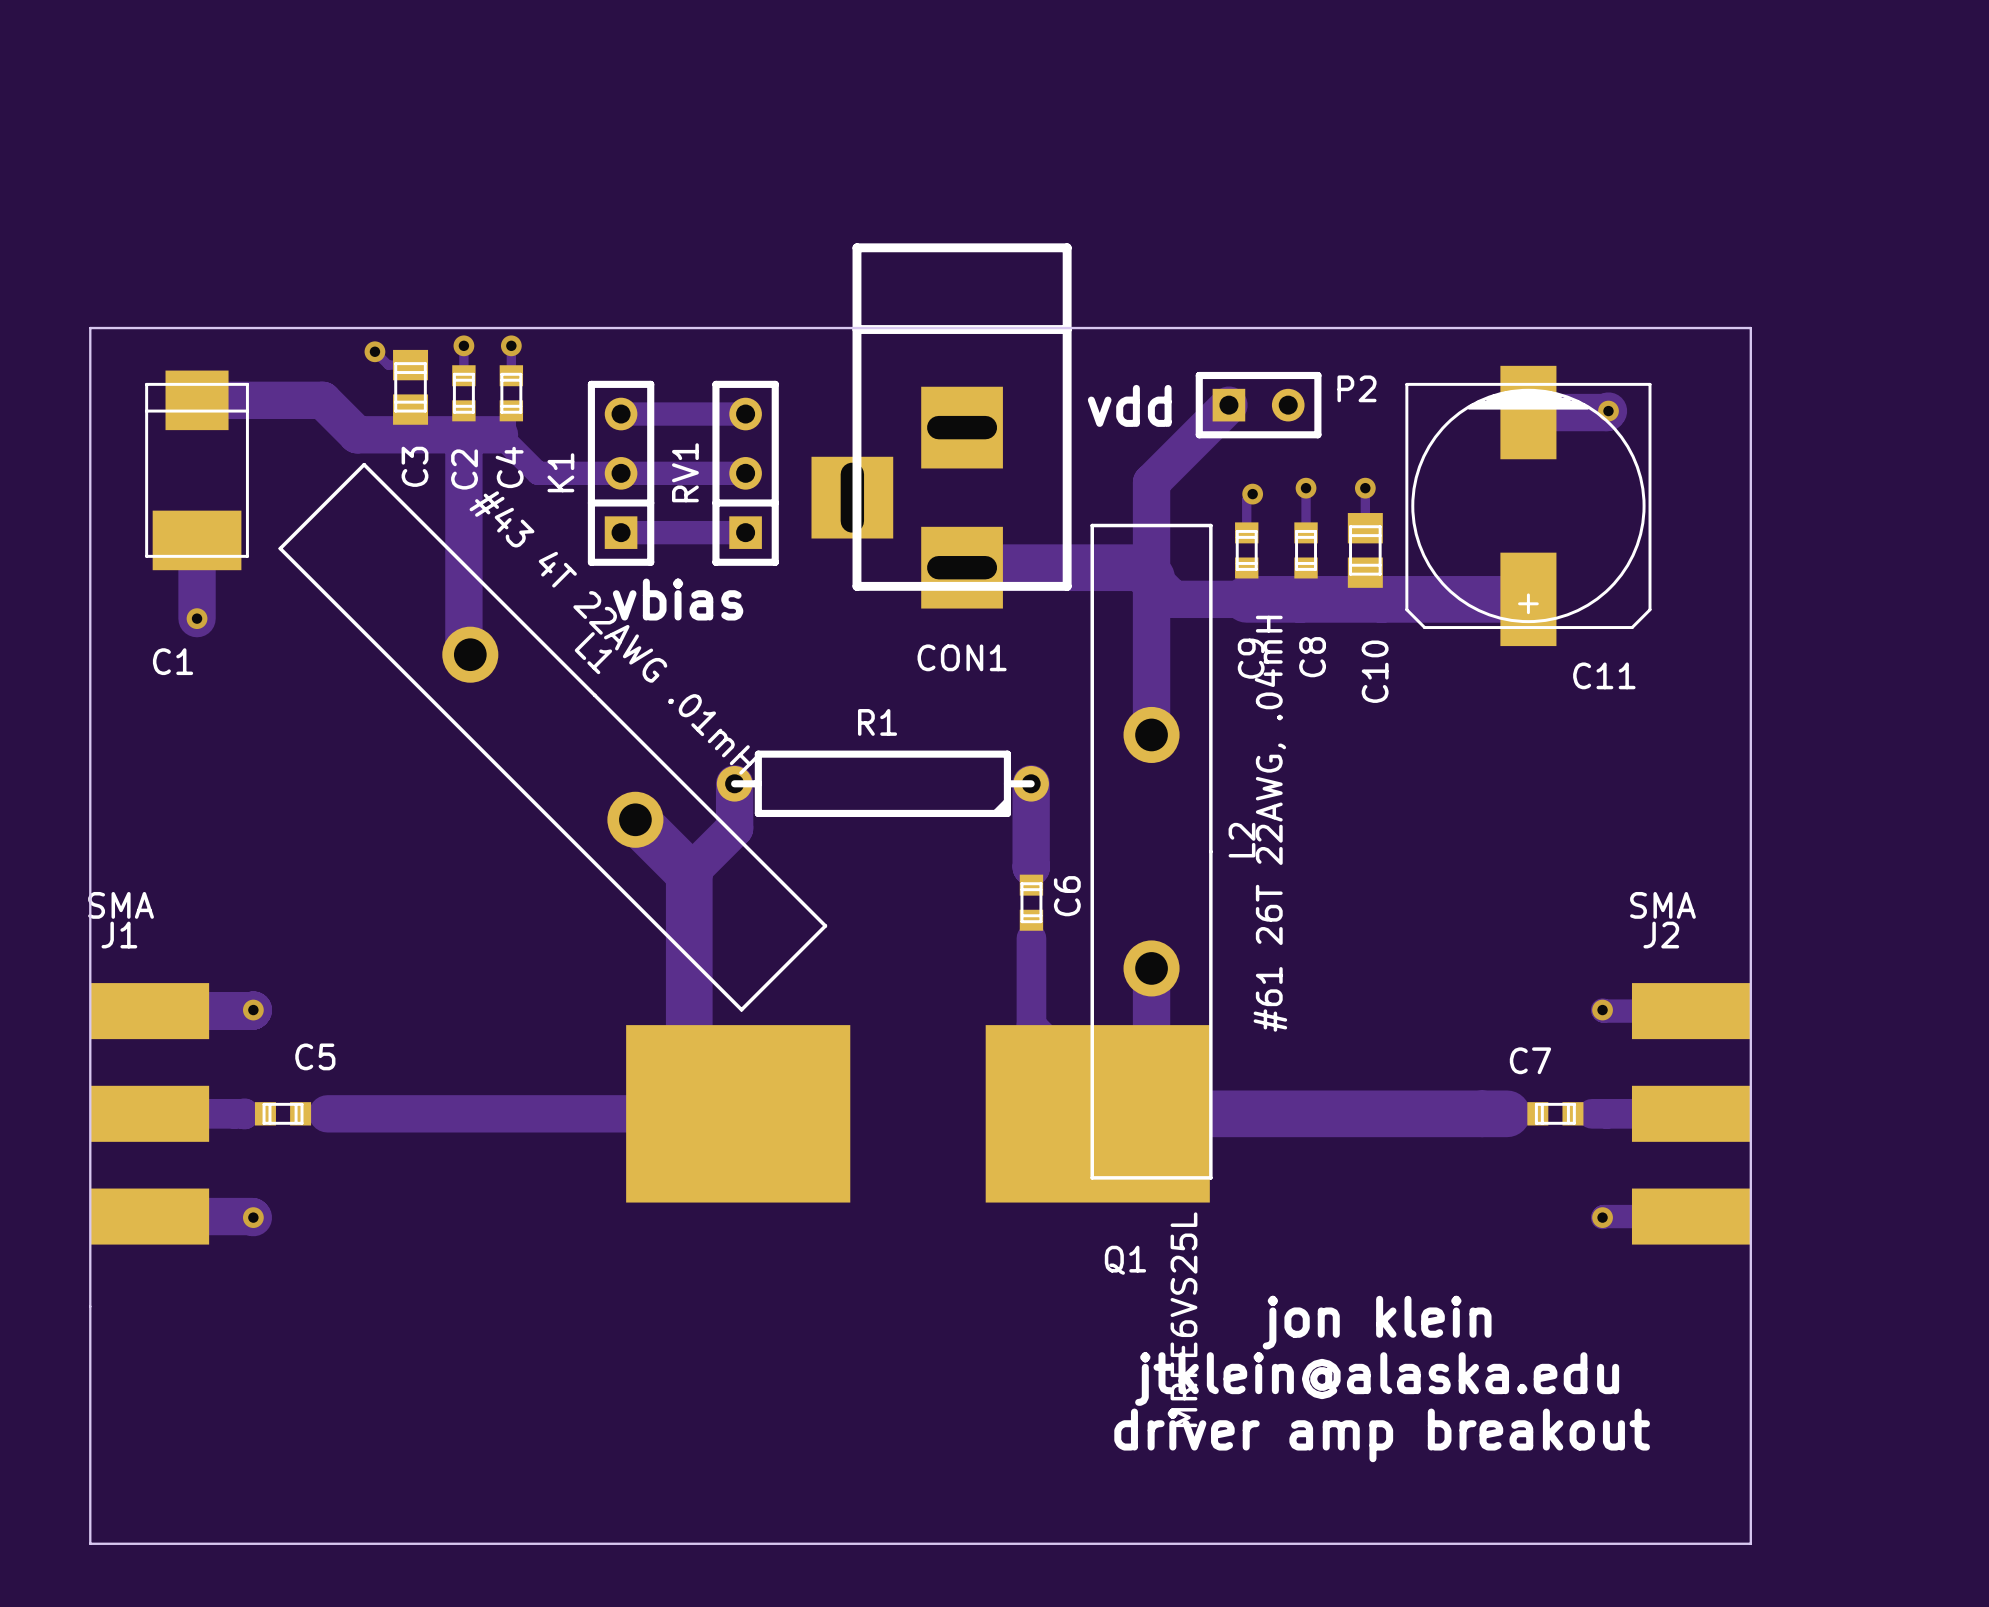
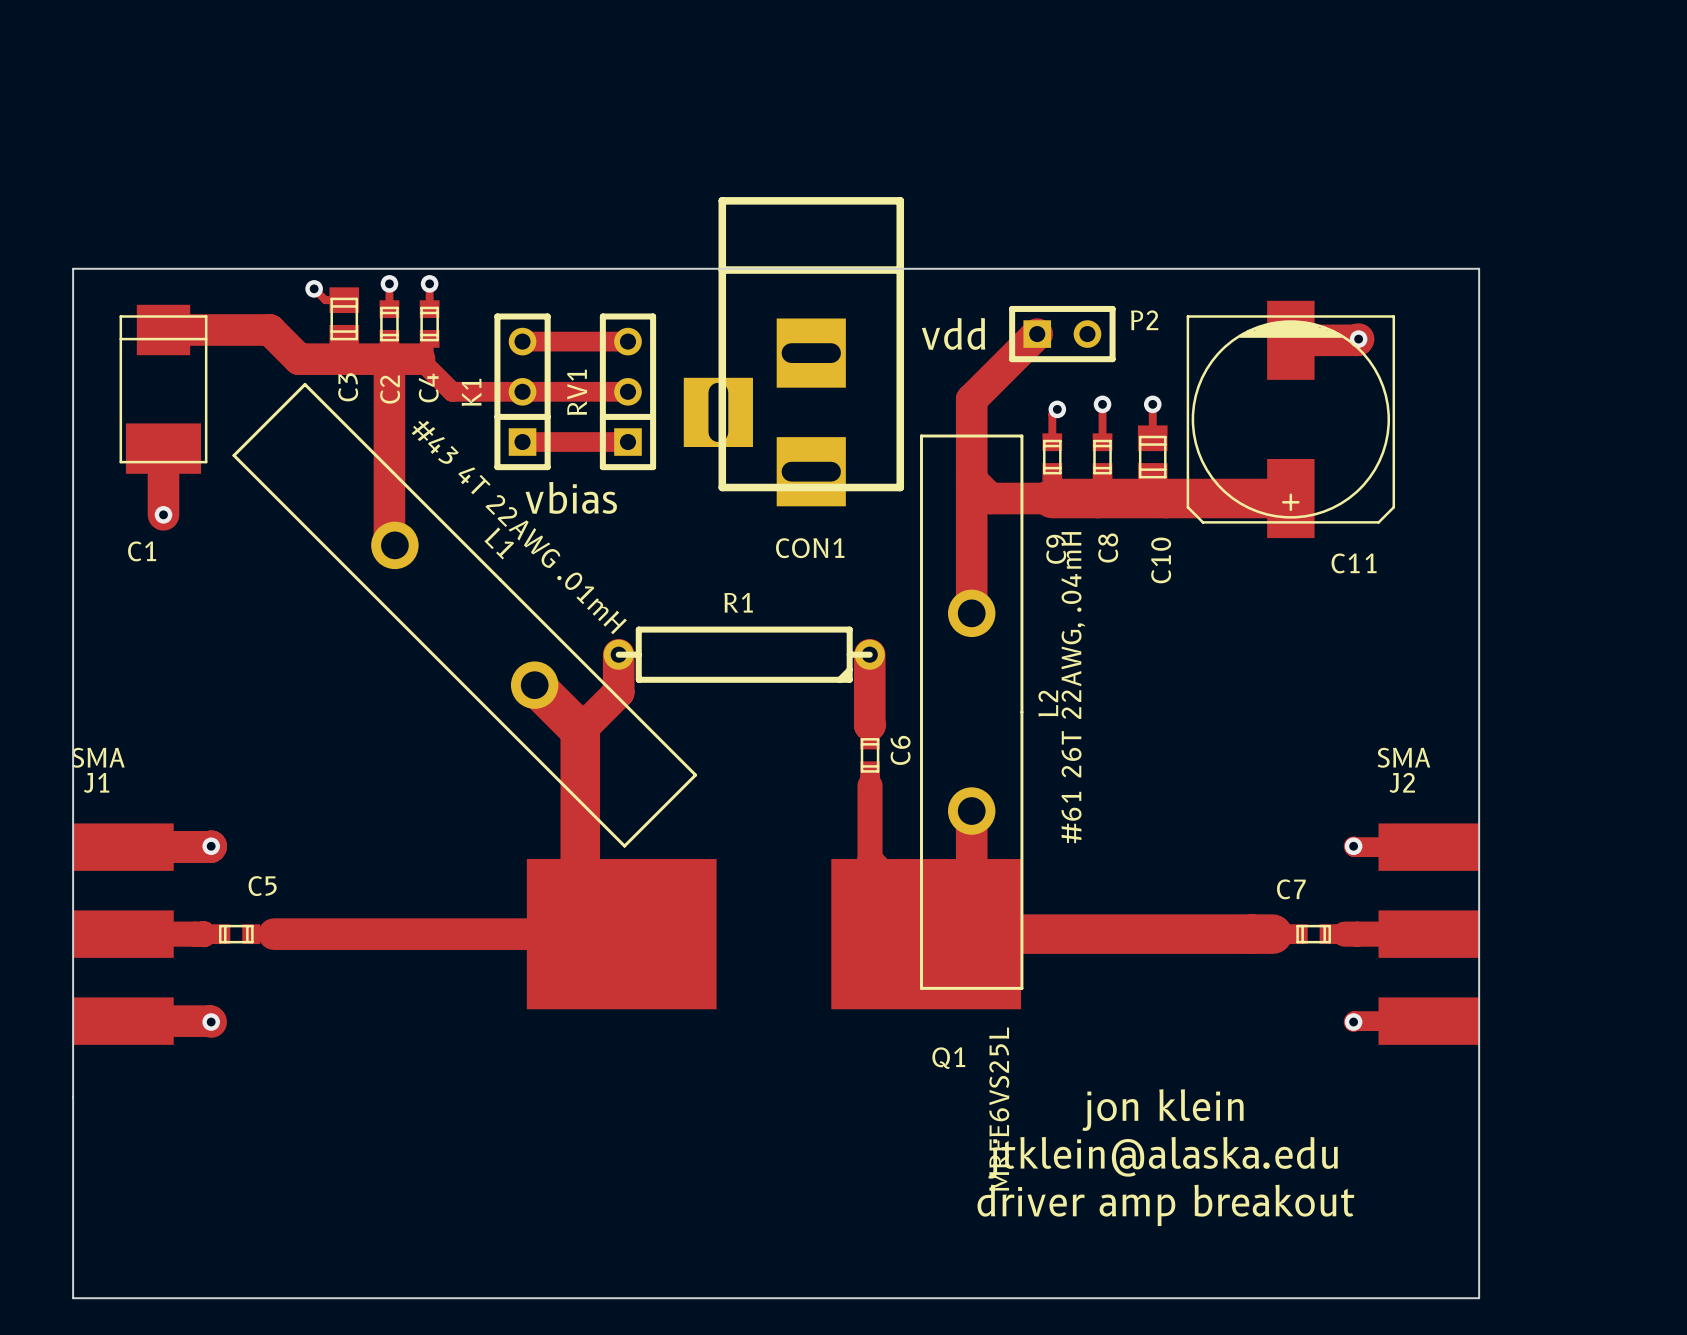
track: (962, 567) (1141, 567) (1151, 577) -> none

